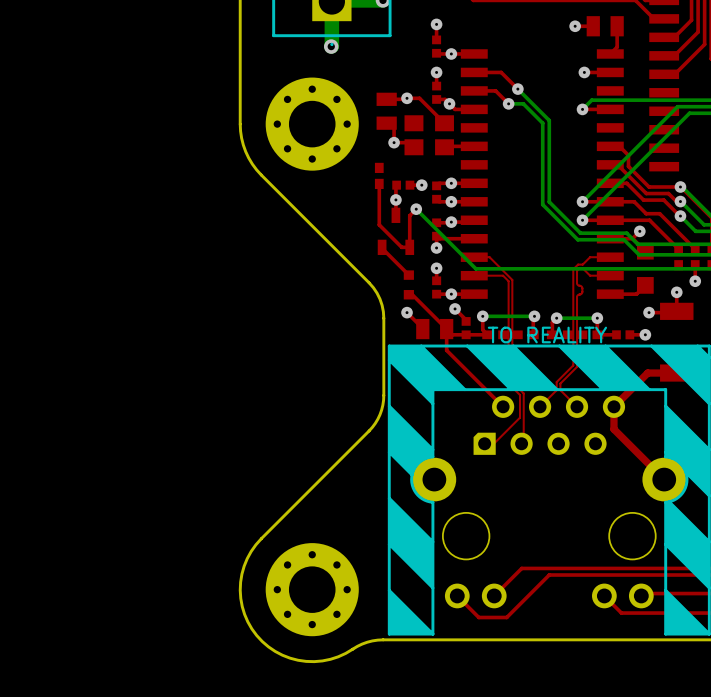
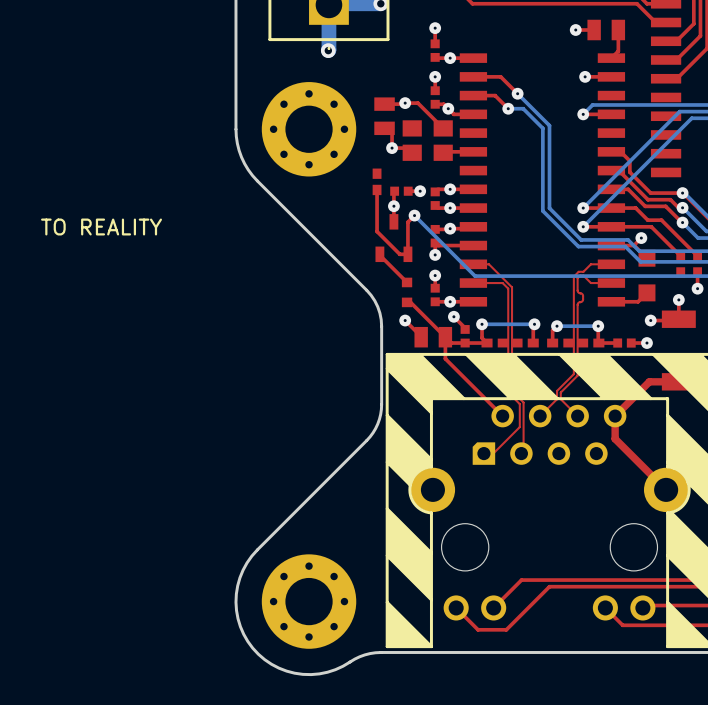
text: none -> TO REALITY (101, 227)
text: TO REALITY (547, 334) -> none

